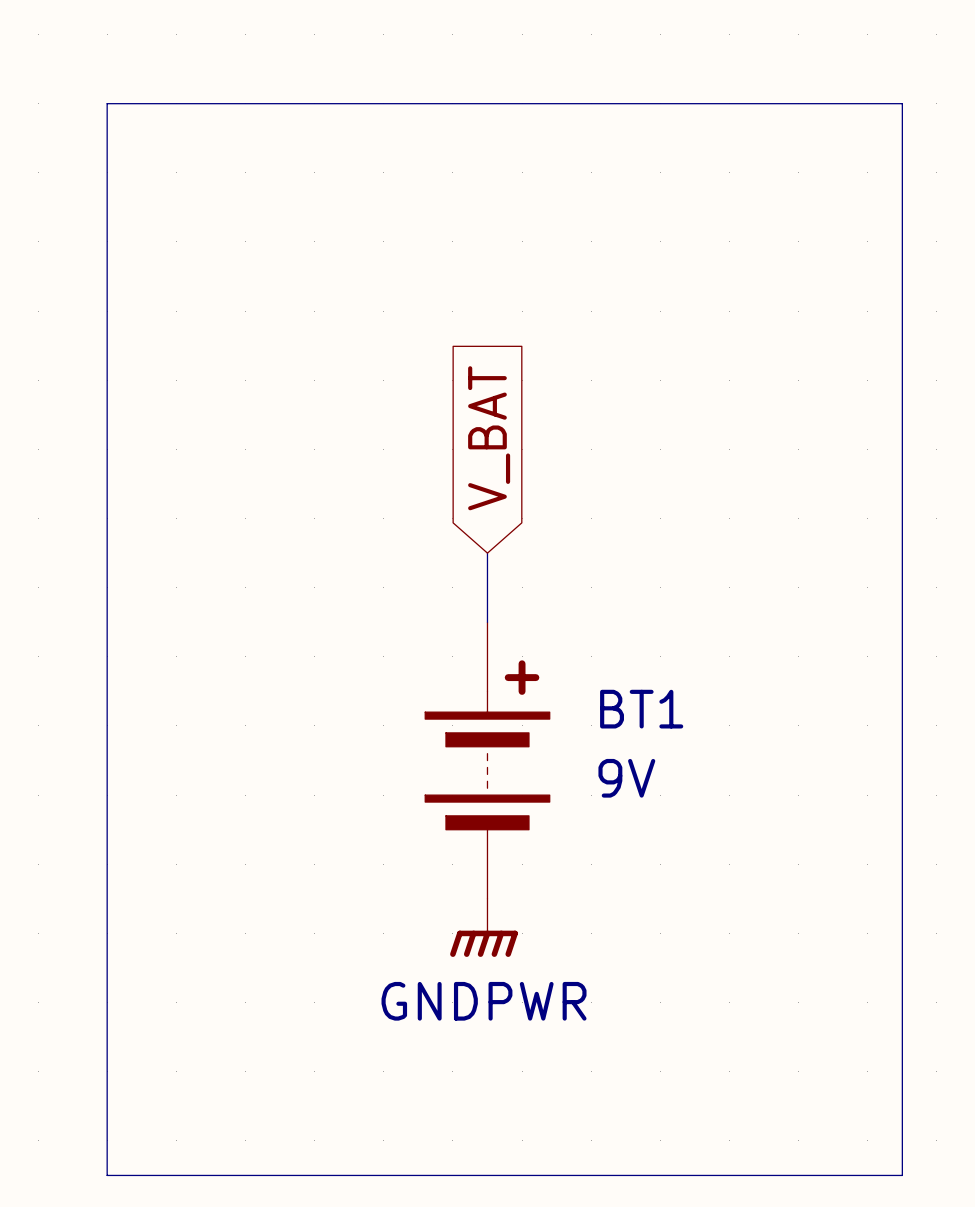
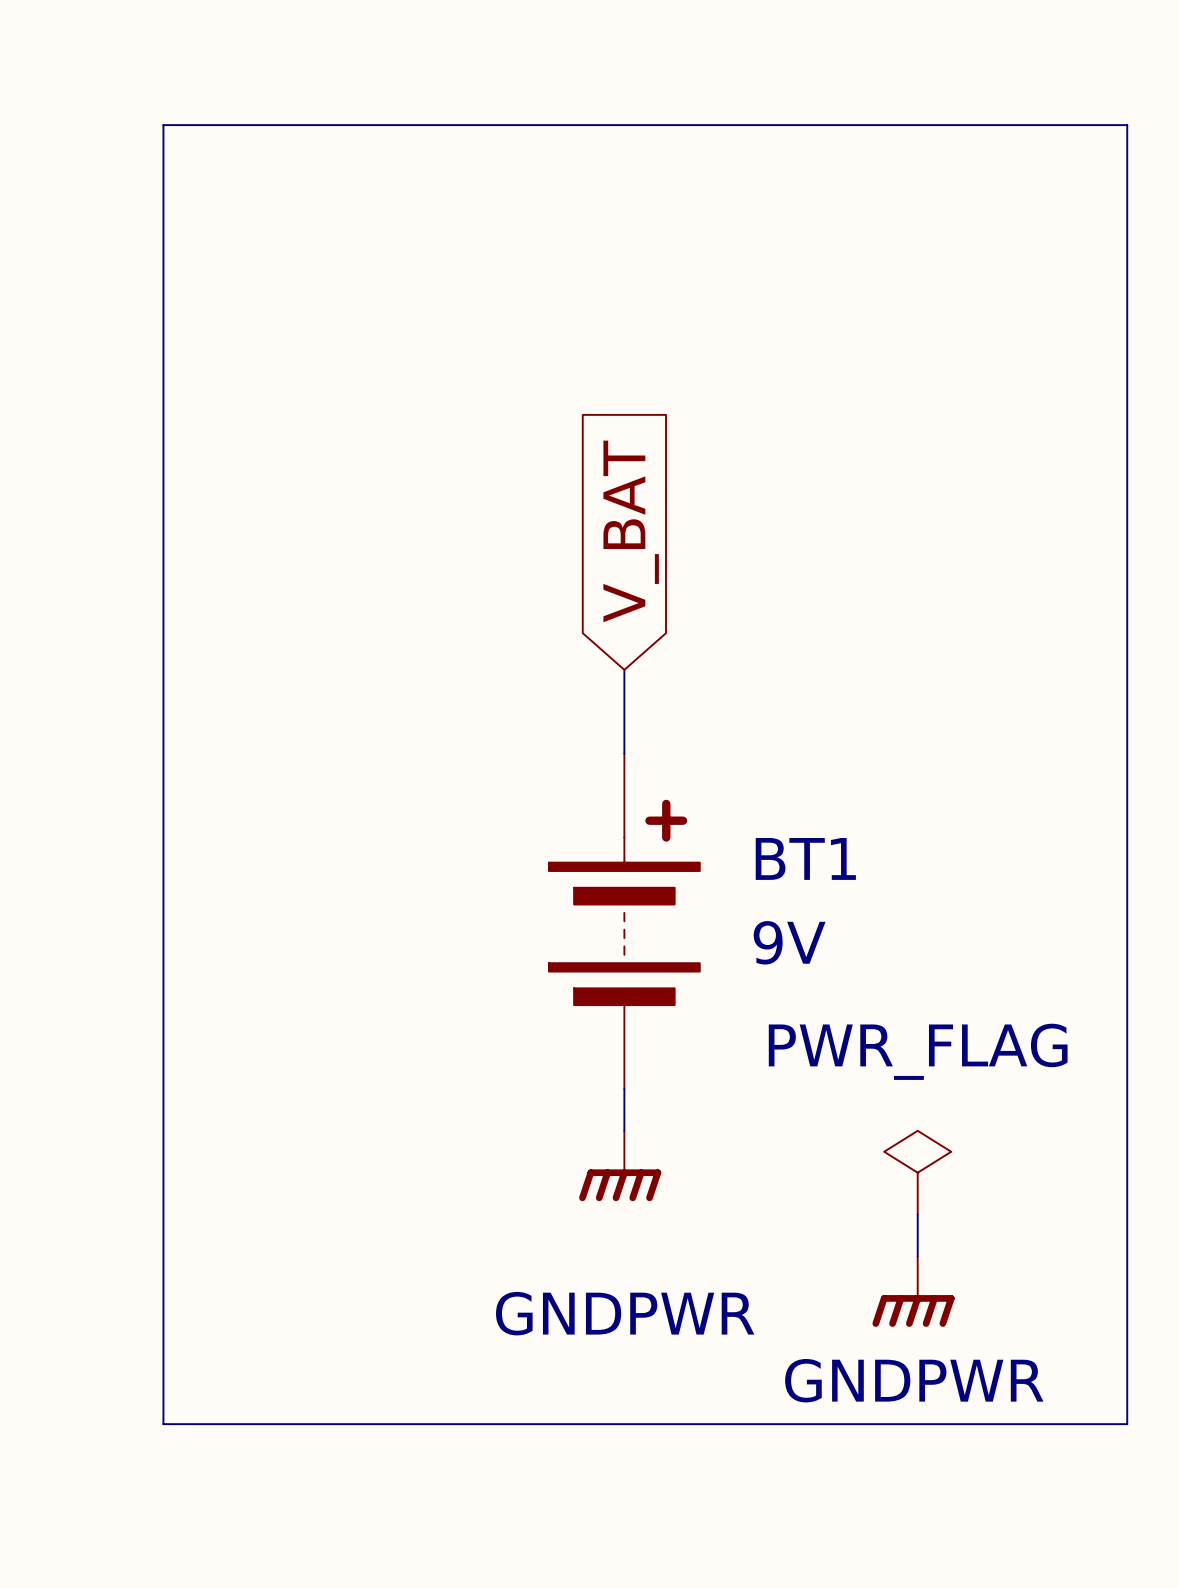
power symbol position: GNDPWR (484, 927) -> GNDPWR (620, 1166)
power symbol: none -> PWR_FLAG (917, 1172)
power symbol text position: GNDPWR (484, 1001) -> GNDPWR (625, 1313)
wire: none -> (917, 1214) (917, 1256)
power symbol: none -> GNDPWR (913, 1291)

